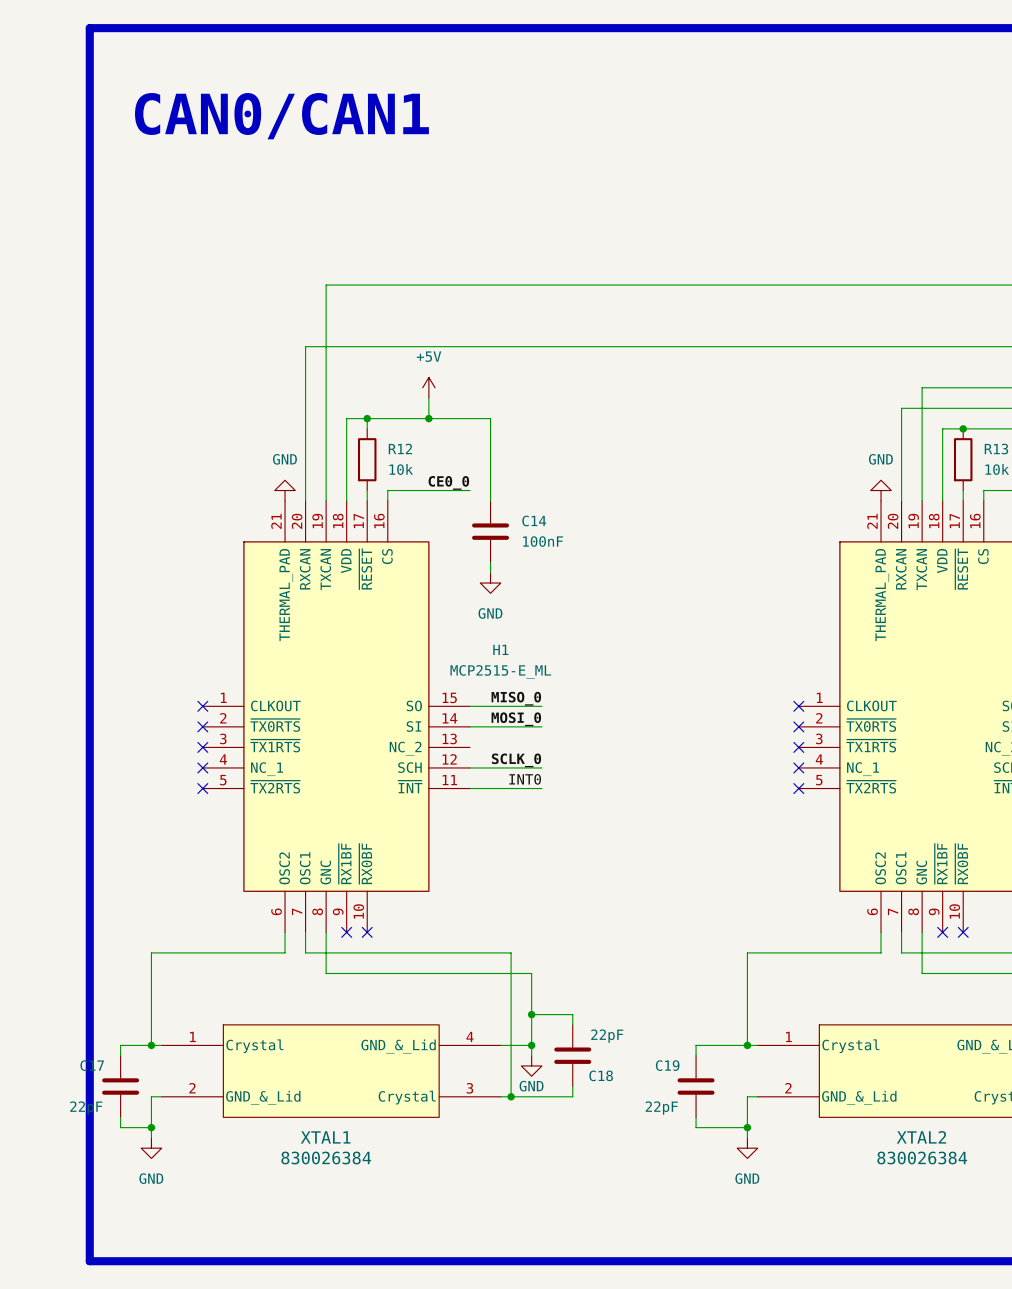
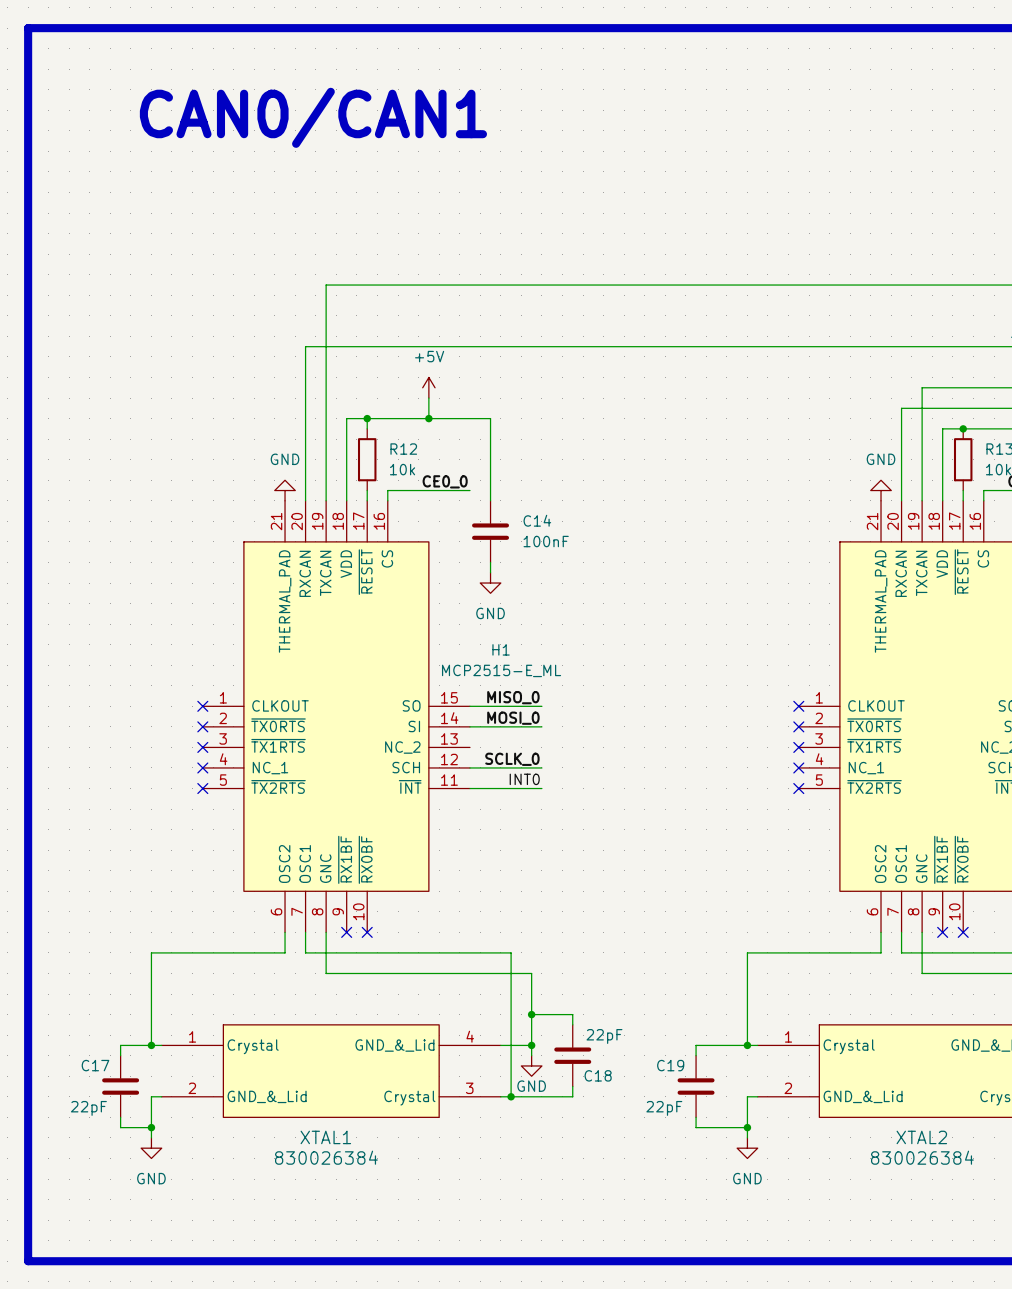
line: (89, 28) (89, 1261) -> (89, 28) (28, 28) (28, 1261) (89, 1261)

